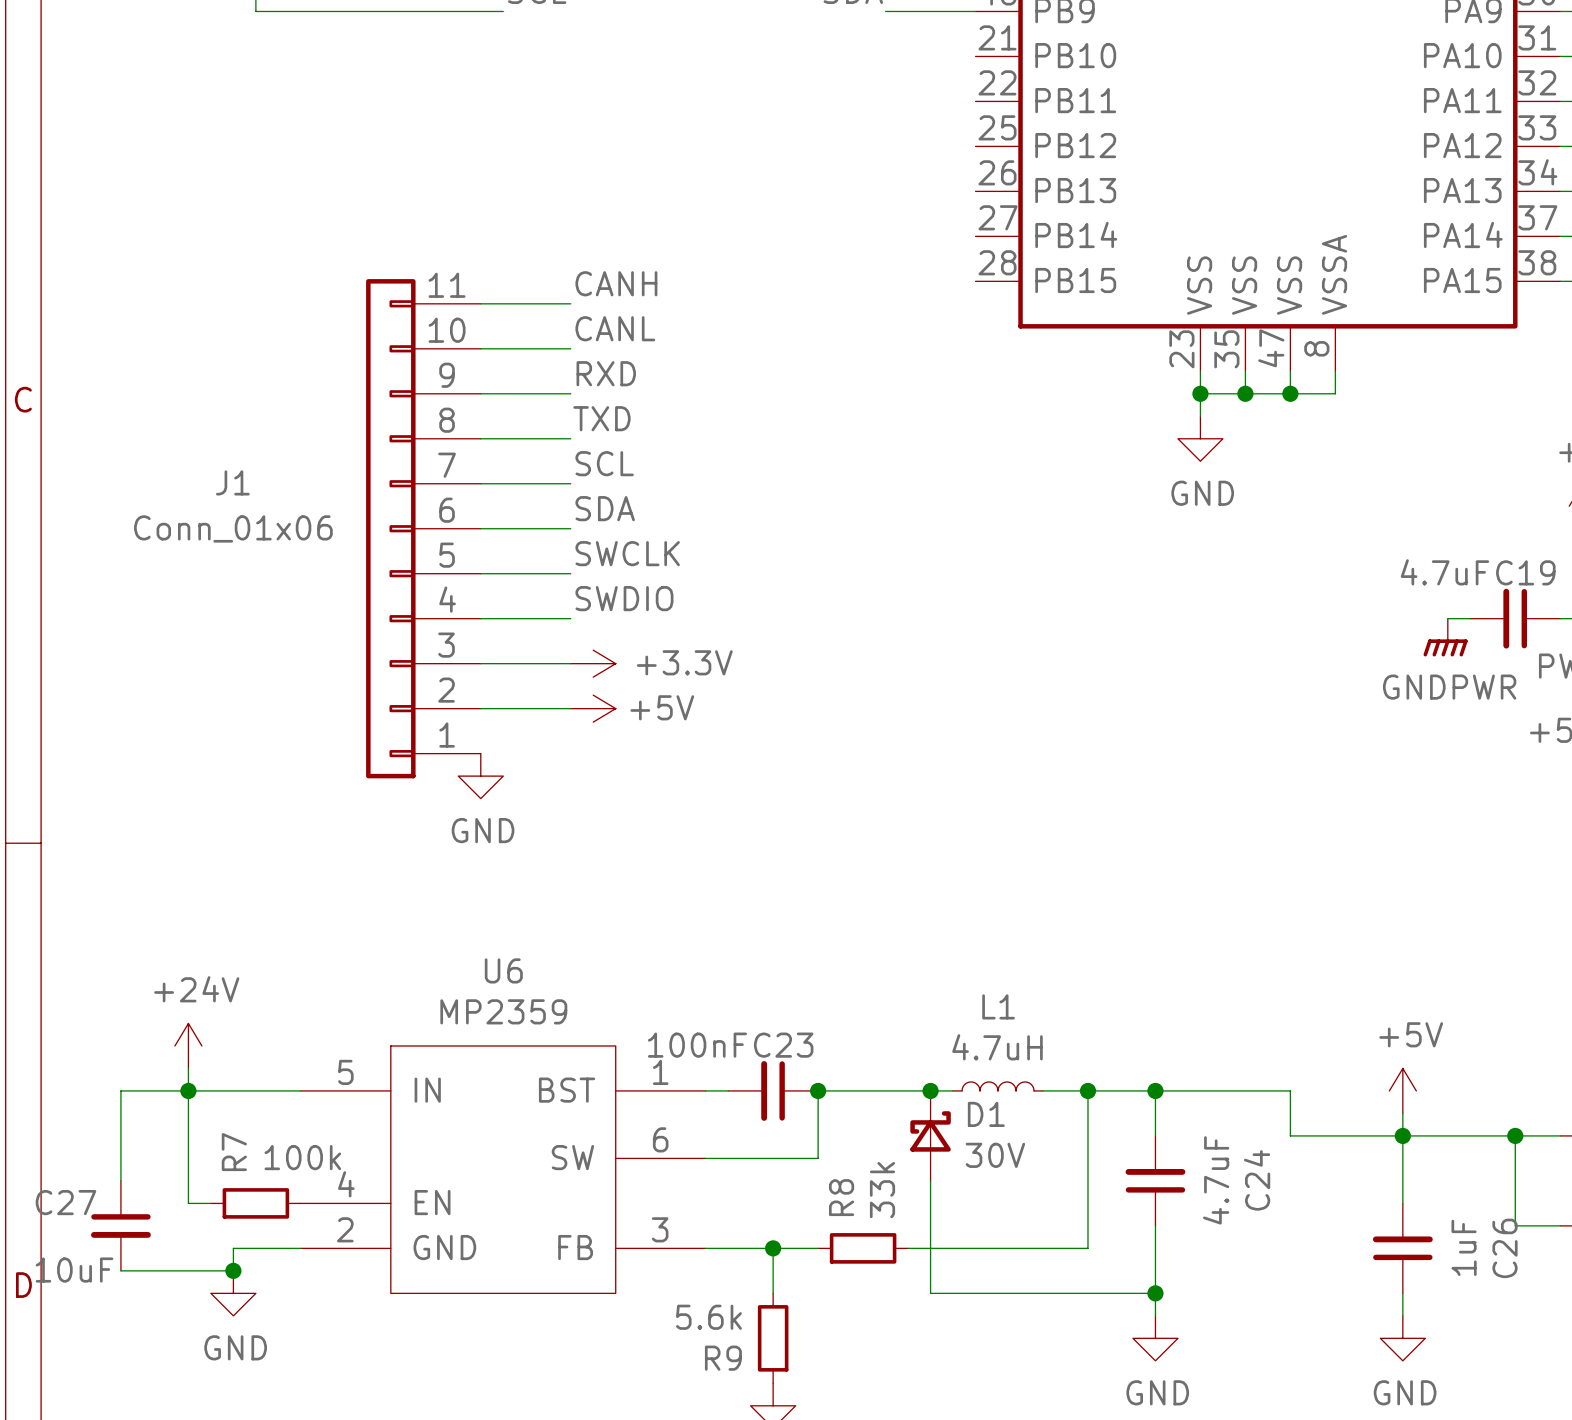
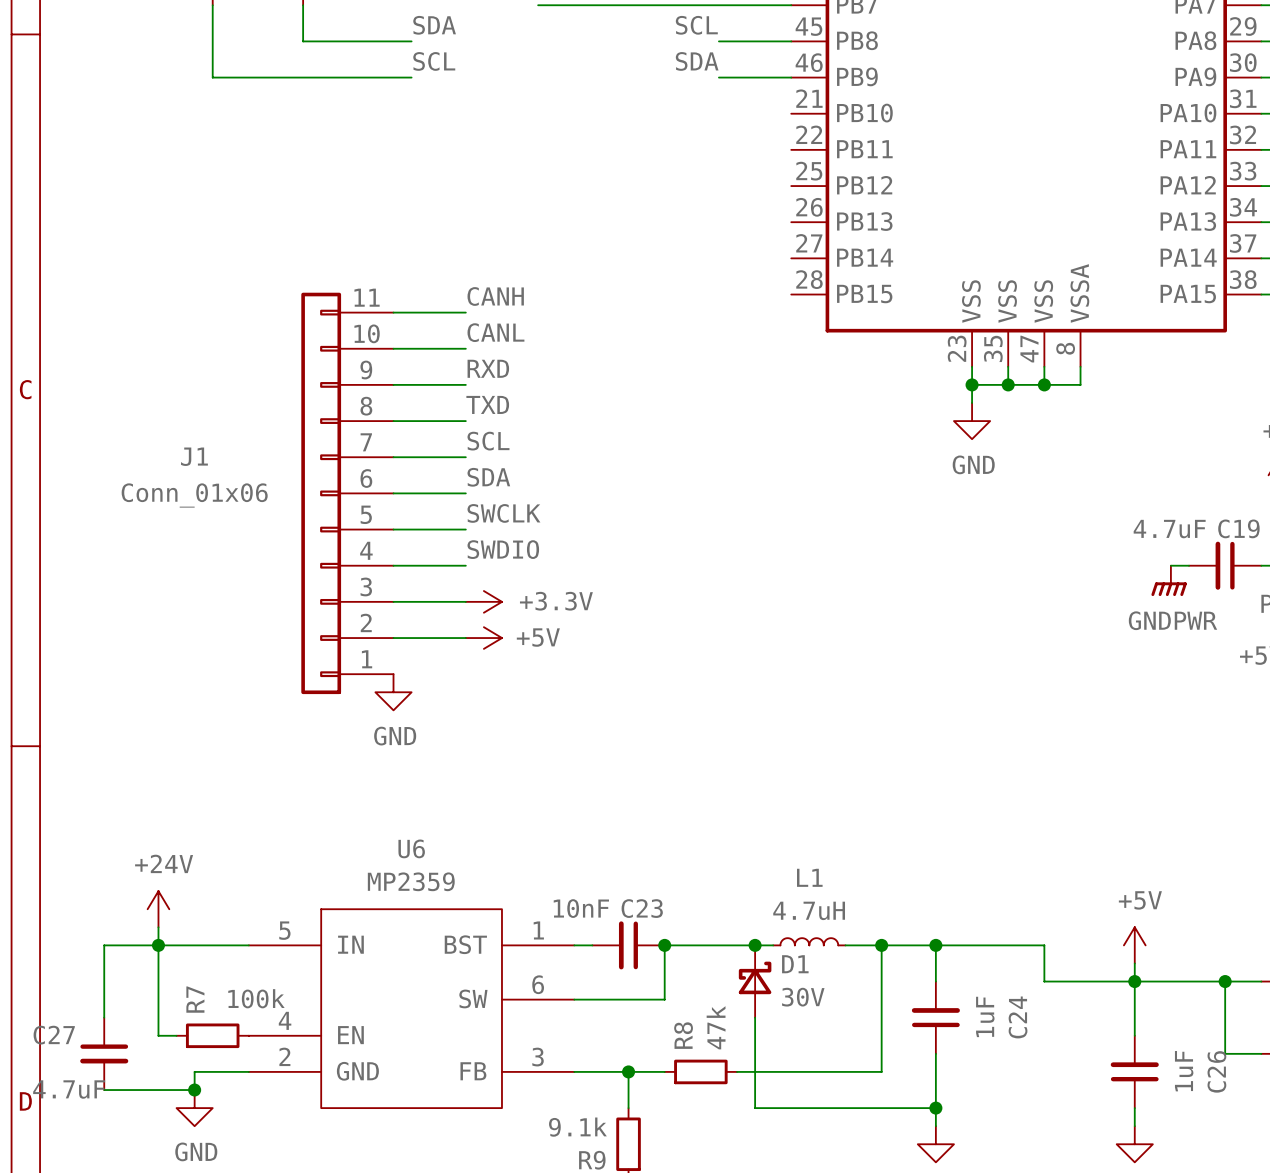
C23 value: 100nF (697, 1045) -> 10nF (581, 908)
C24 value: 4.7uF (1216, 1180) -> 1uF (985, 1016)
R8 value: 33k (882, 1190) -> 47k (716, 1027)
C27 value: 10uF (74, 1270) -> 4.7uF (69, 1089)
R9 value: 5.6k (708, 1317) -> 9.1k (577, 1127)

